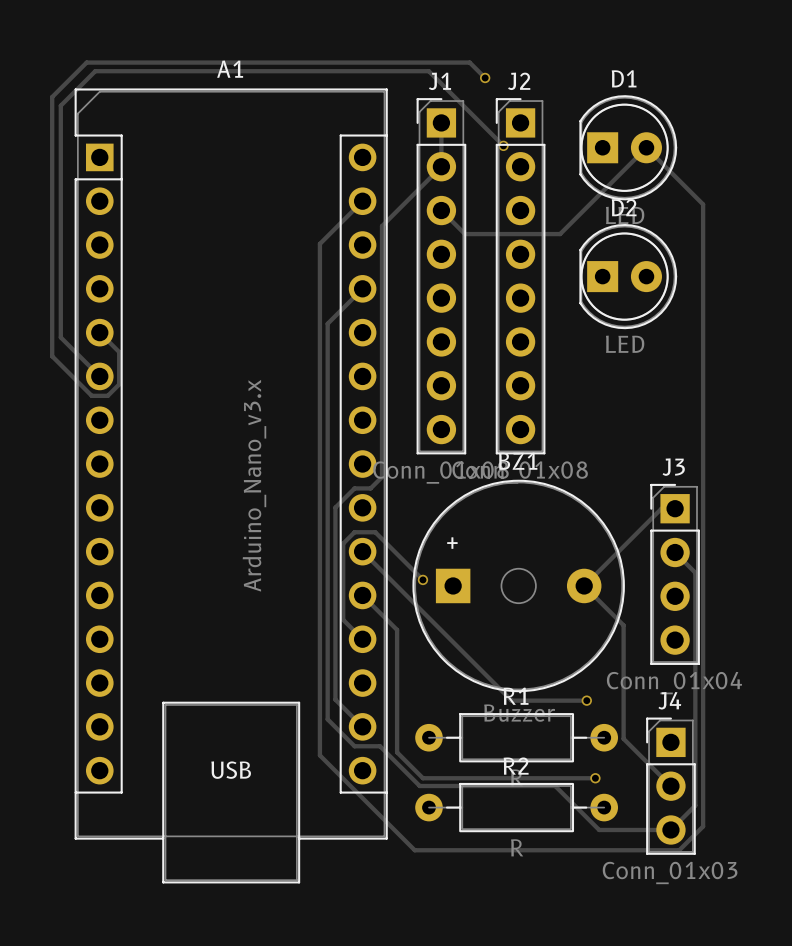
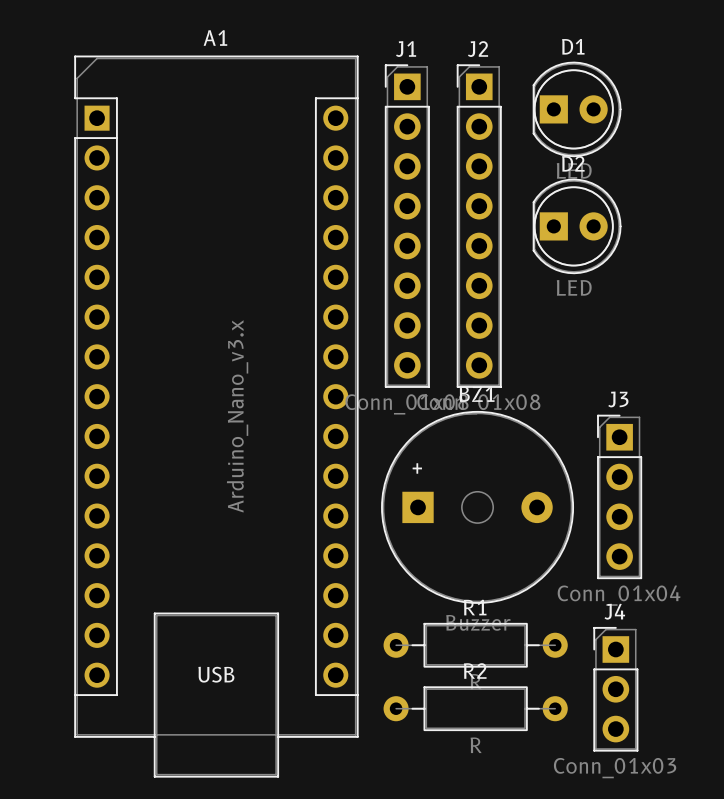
track: (485, 77) (469, 62) (86, 62) (52, 97) (52, 356) (91, 395) (107, 395) (119, 384) (119, 352) (99, 332) -> none
via: (485, 77) -> none
track: (441, 122) (441, 166) (382, 226) (382, 477) (370, 488) (354, 488) (335, 507) (335, 699) (362, 726) -> none
track: (503, 145) (428, 71) (95, 71) (60, 105) (60, 337) (99, 376) -> none
via: (503, 145) -> none
track: (362, 201) (319, 243) (319, 755) (414, 850) (679, 850) (703, 826) (703, 204) (646, 147) (560, 234) (464, 234) (441, 210) -> none
track: (362, 288) (327, 323) (327, 719) (354, 746) (380, 746) (419, 786) (555, 786) (599, 829) (670, 829) (695, 805) (695, 572) (675, 552) -> none
track: (675, 508) (661, 508) (584, 585) (623, 625) (623, 738) (670, 786) -> none
track: (362, 551) (511, 700) (586, 700) -> none
track: (422, 579) (375, 532) (354, 532) (343, 543) (343, 619) (362, 639) -> none
via: (422, 579) -> none
track: (362, 595) (397, 629) (397, 752) (422, 778) (595, 778) -> none
via: (586, 700) -> none
via: (595, 778) -> none

